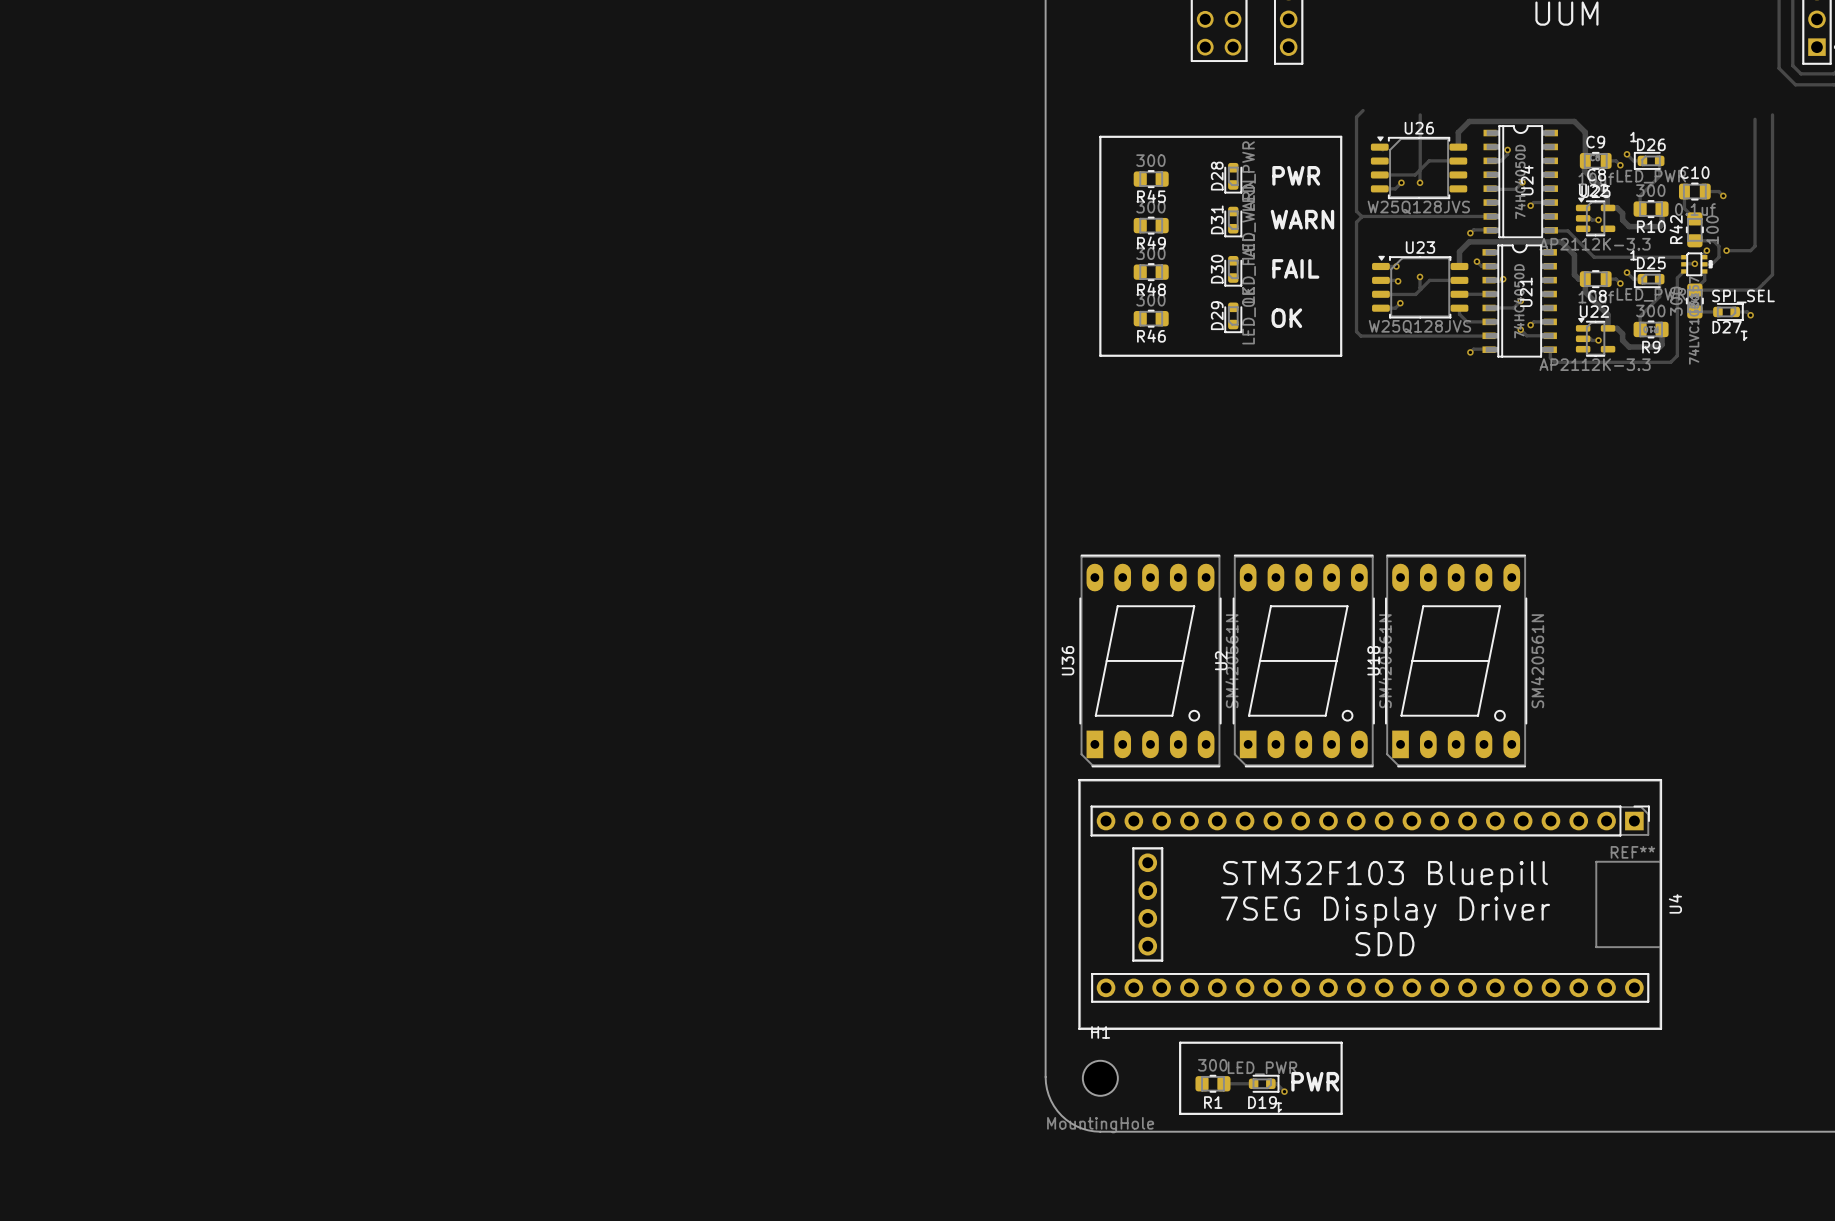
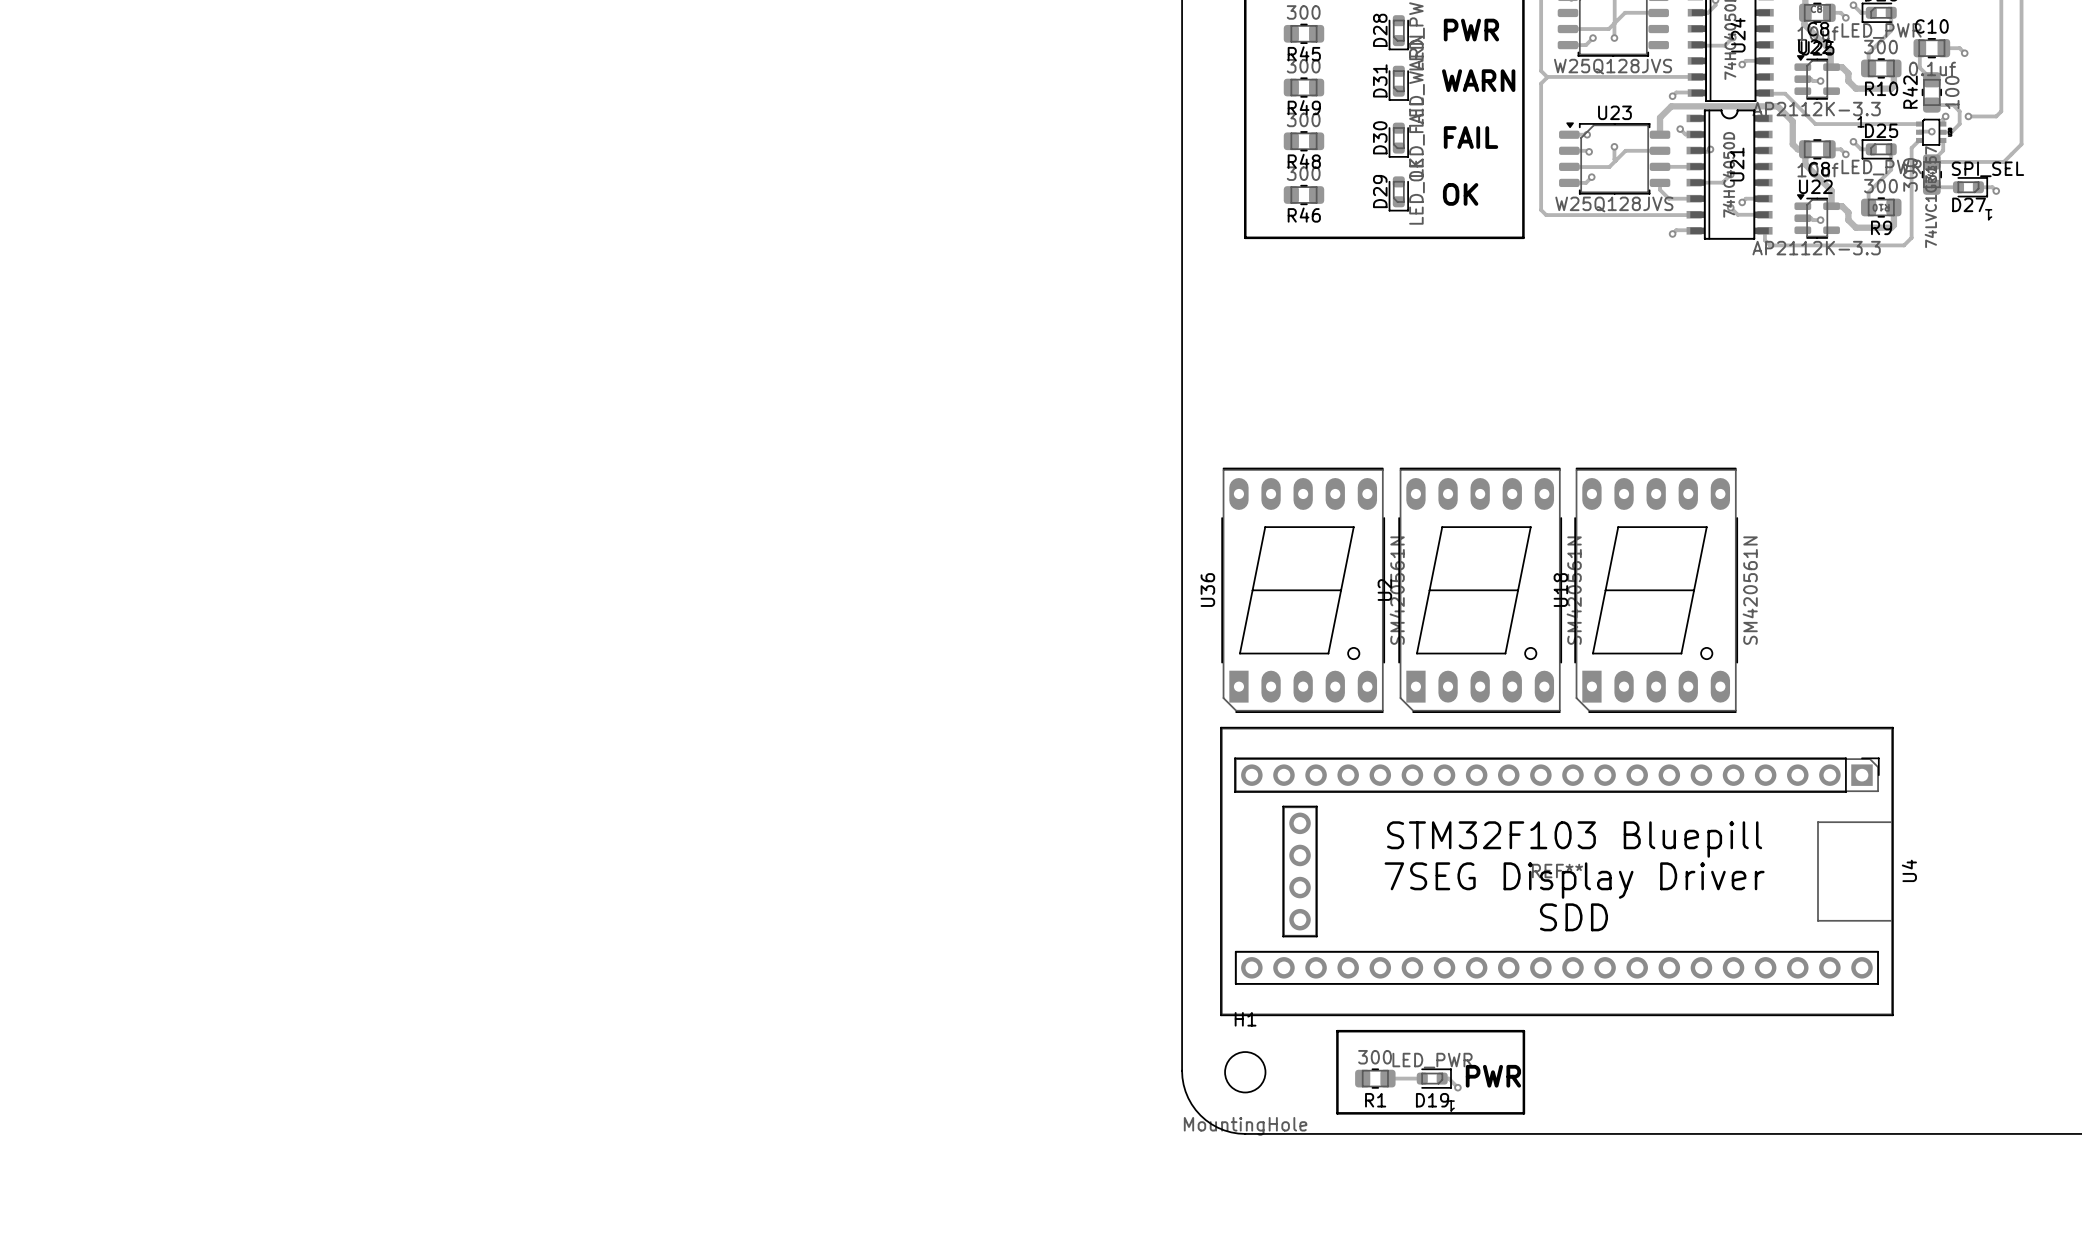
U4 text position: REF** (1632, 852) -> REF** (1557, 871)

